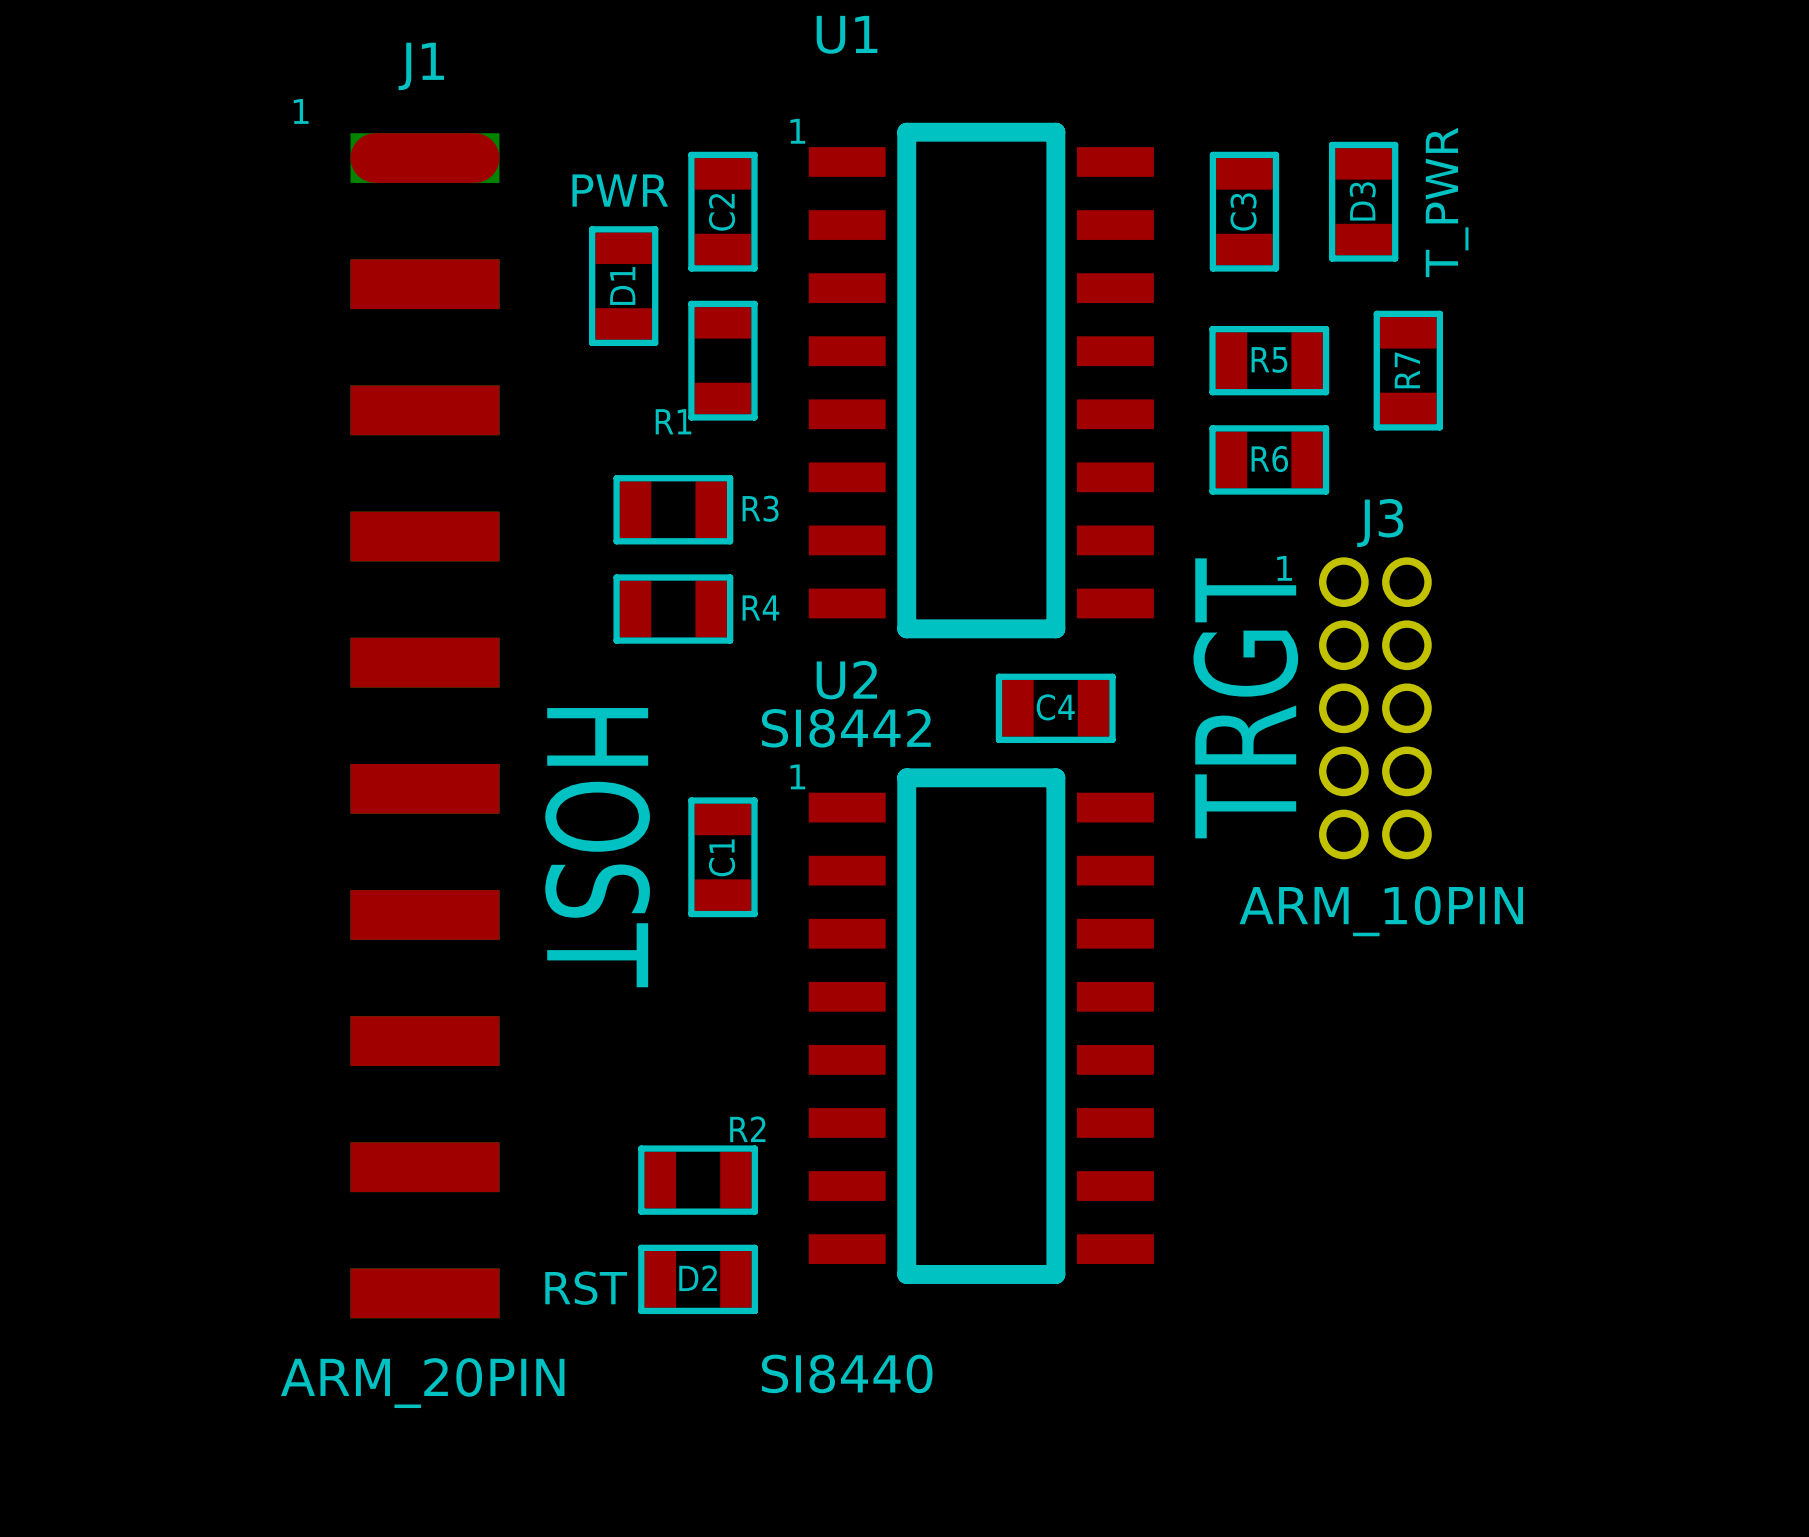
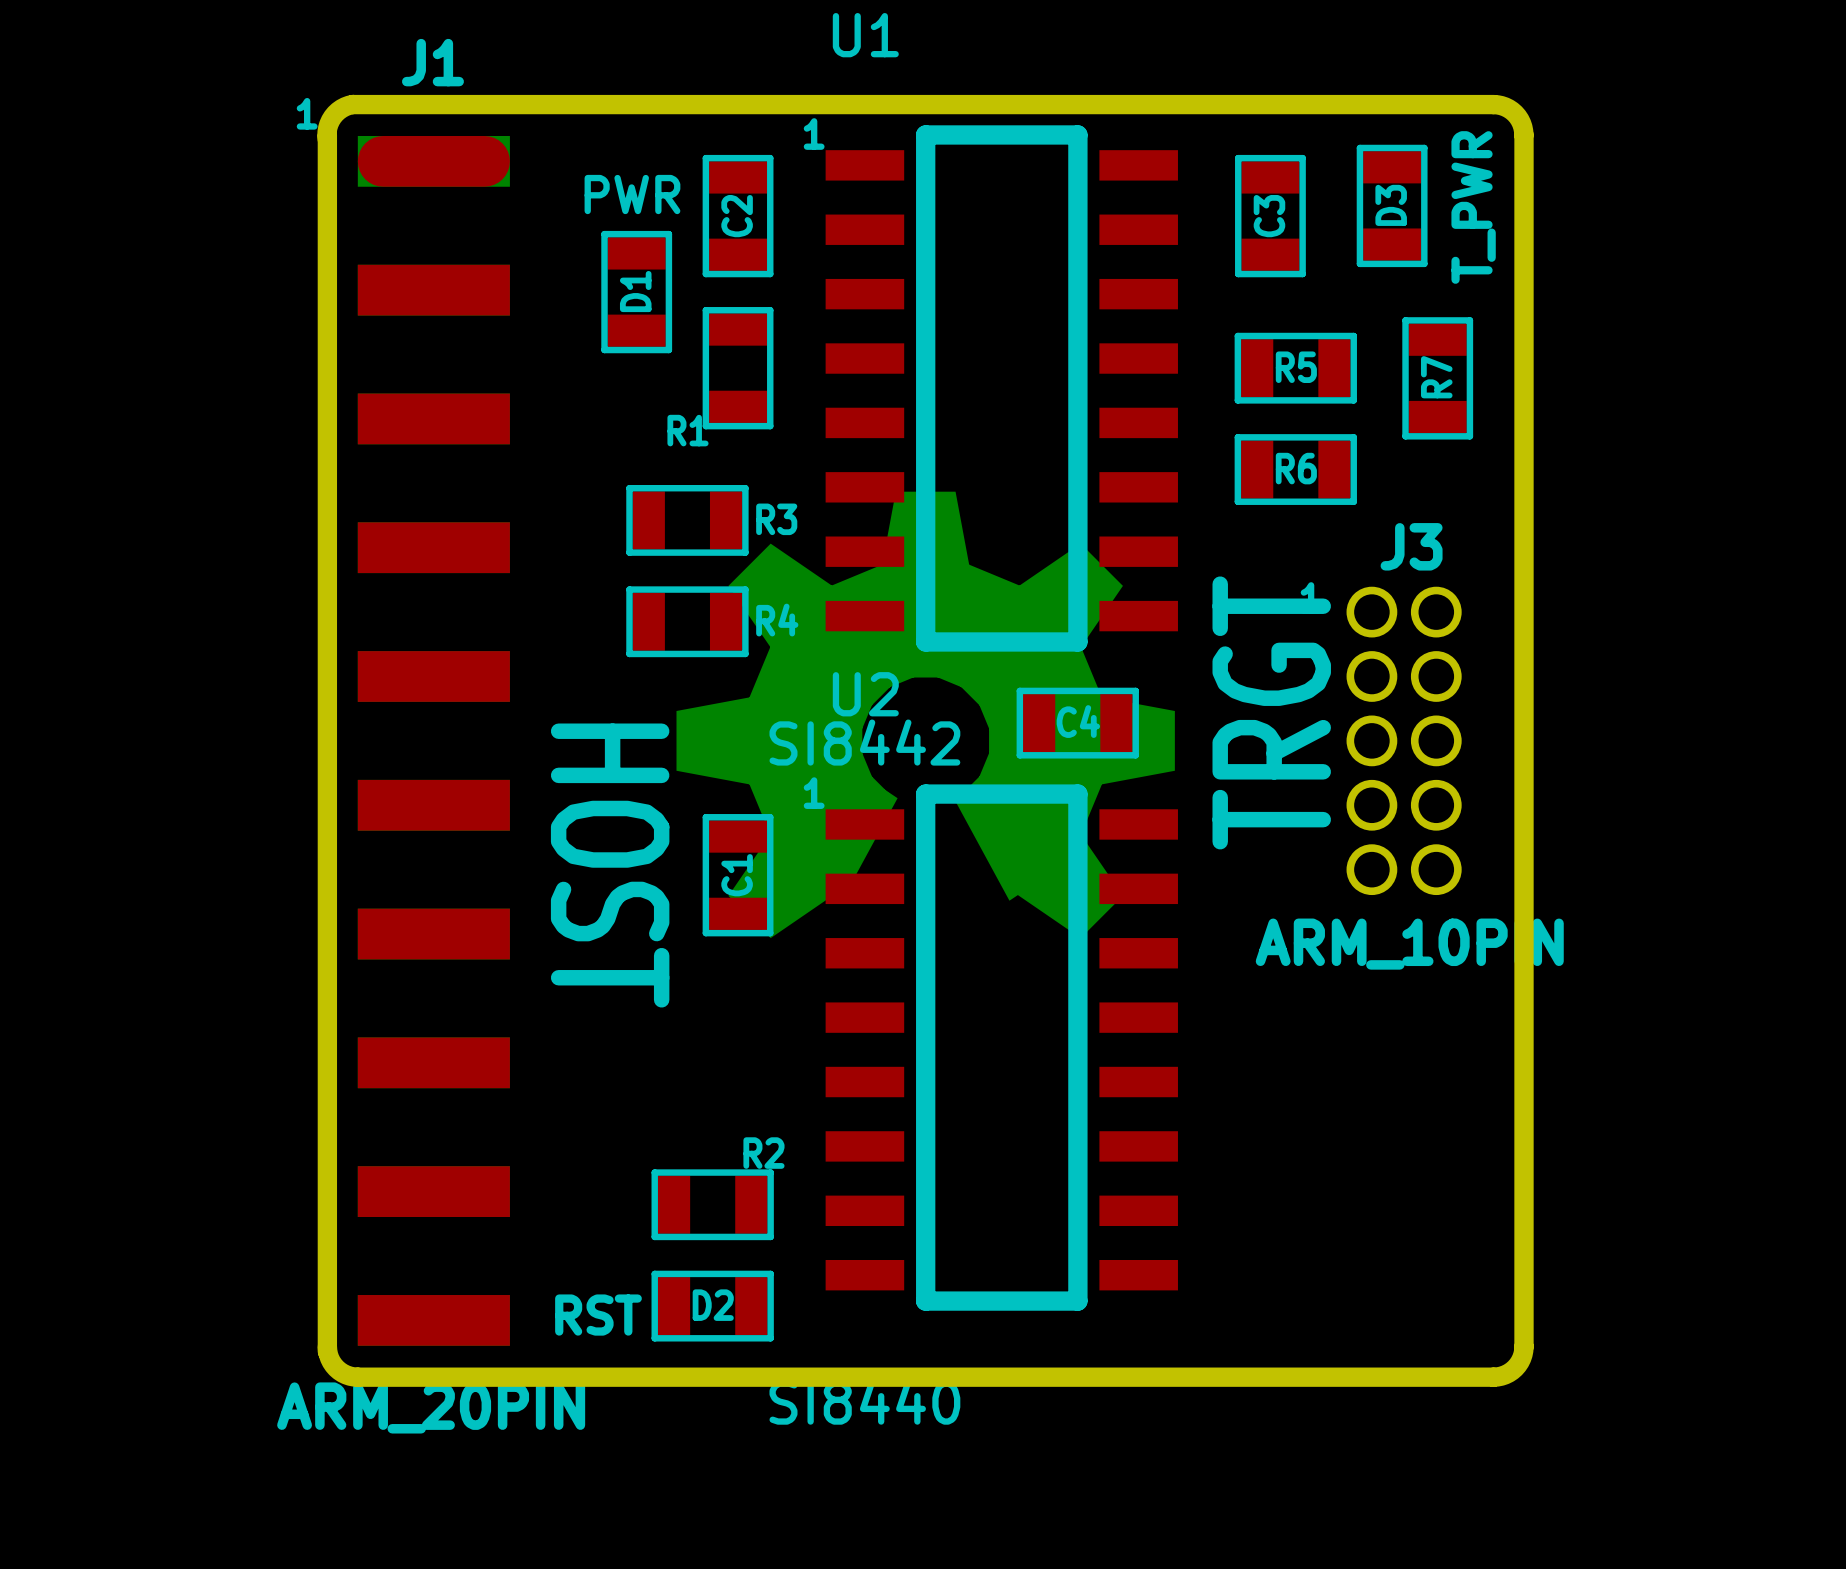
board edge: none -> (327, 134) (327, 1351)
board edge: none -> (327, 139) (327, 127) (332, 116) (341, 108) (352, 104) (1493, 104) (1505, 106) (1514, 113) (1521, 123) (1523, 134) (1524, 1346) (1521, 1358) (1515, 1368) (1505, 1374) (1493, 1377) (357, 1377) (346, 1374) (336, 1368) (329, 1358) (327, 1346)
part: none -> (925, 714)
J3 position: (1375, 708) -> (1404, 740)

